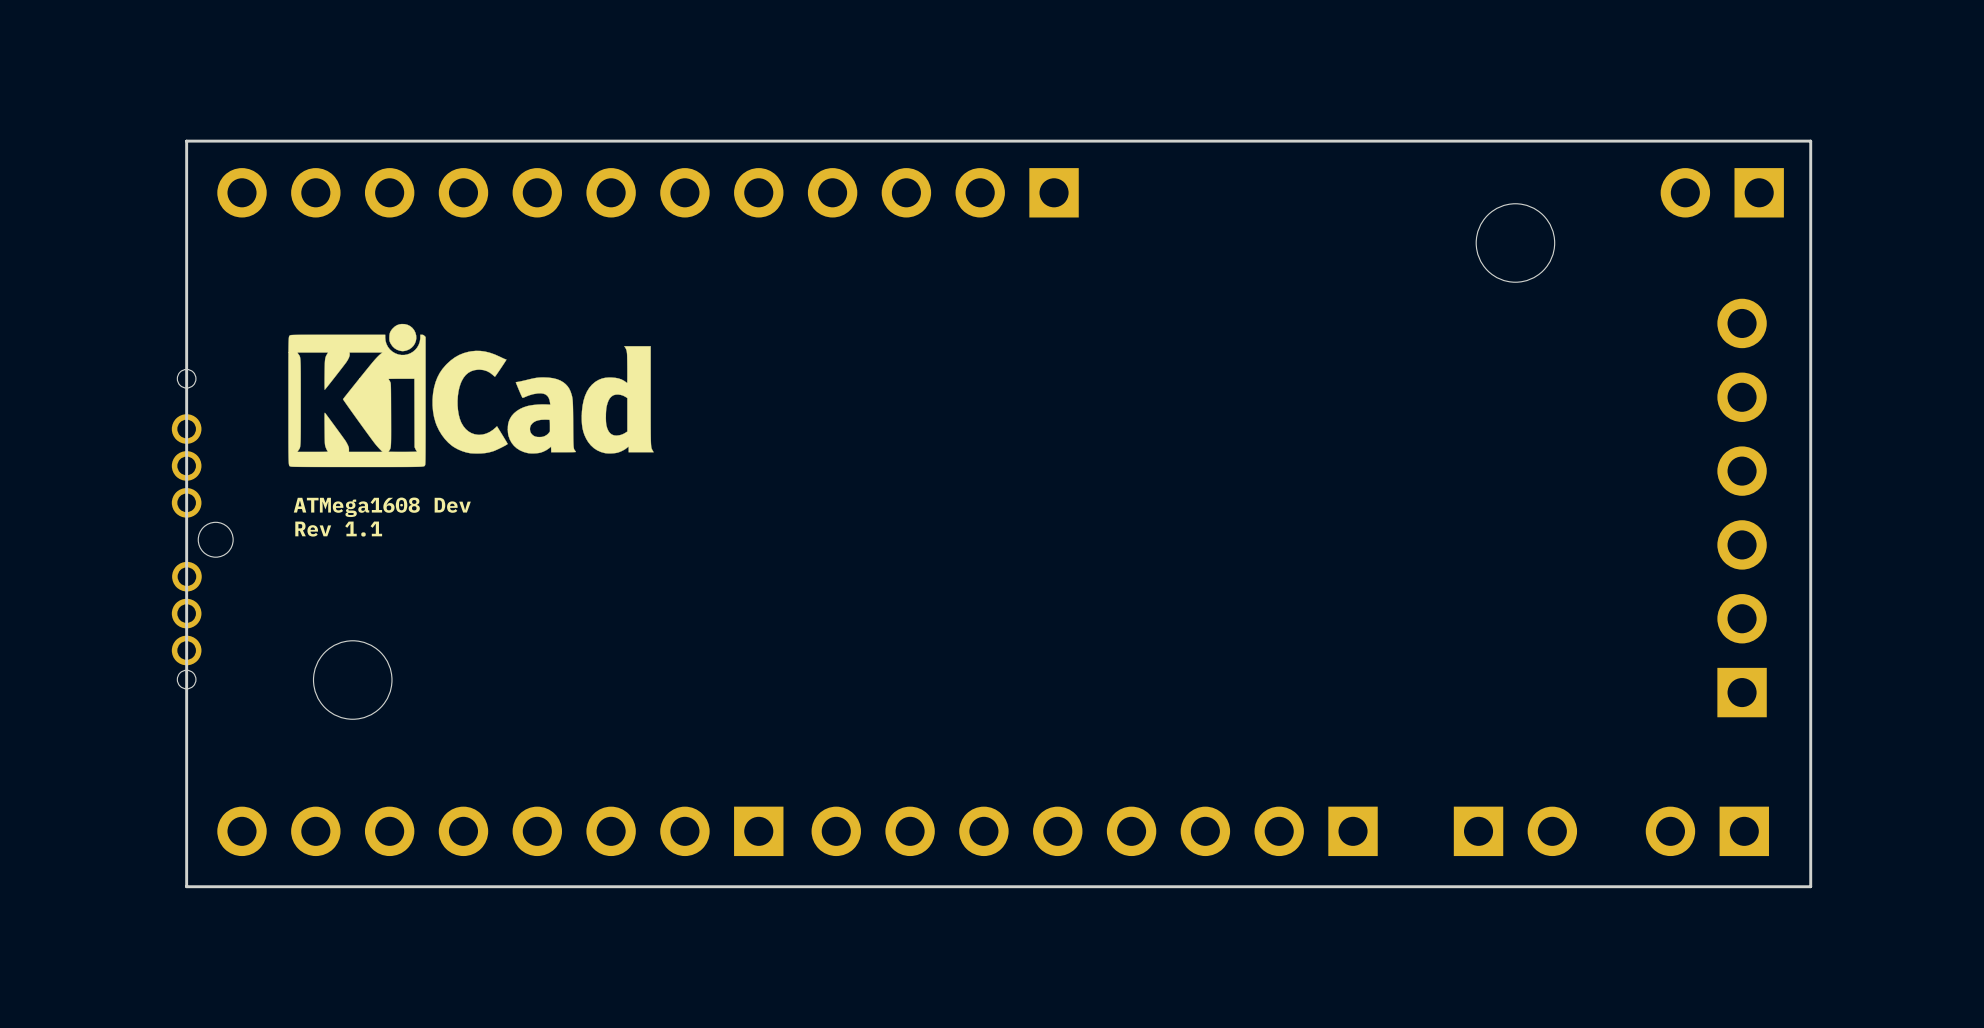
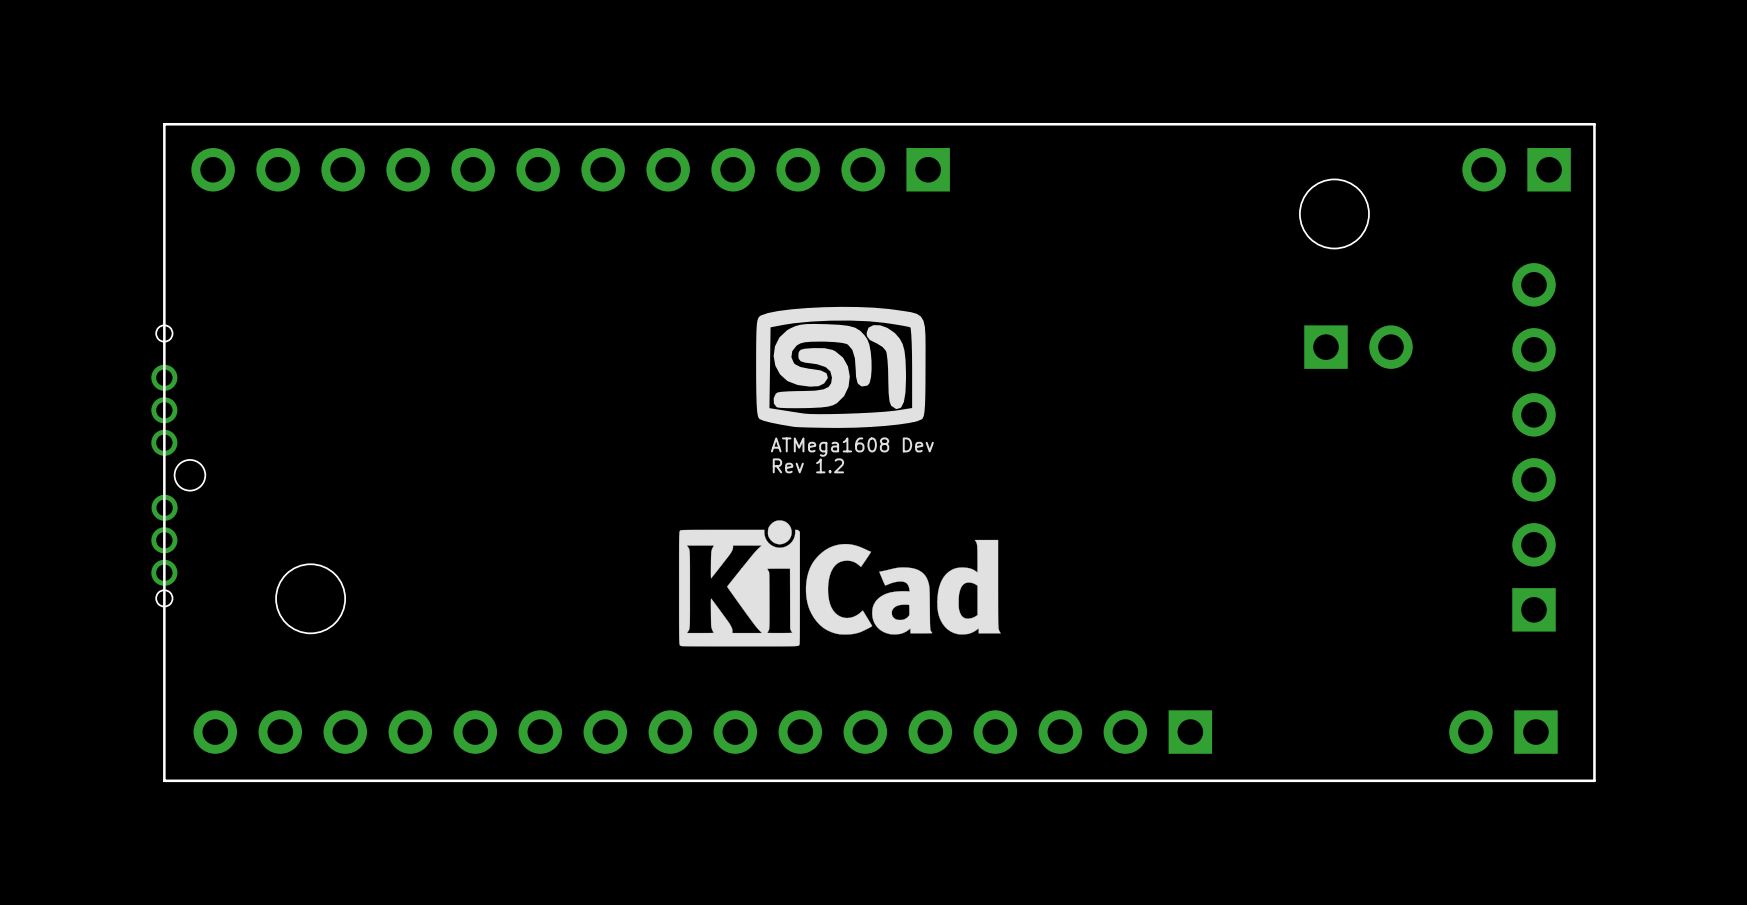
drawing: none -> [756, 306, 926, 428]
drawing position: (471, 395) -> (839, 583)
text position: ATMega1608 Dev (382, 507) -> ATMega1608 Dev (852, 447)
text: Rev 1.1 (338, 529) -> none
text: none -> Rev 1.2 (808, 465)
part: (500, 831) -> none
part: none -> (702, 732)
part: (1094, 831) -> none
part position: (1515, 831) -> (1358, 347)

